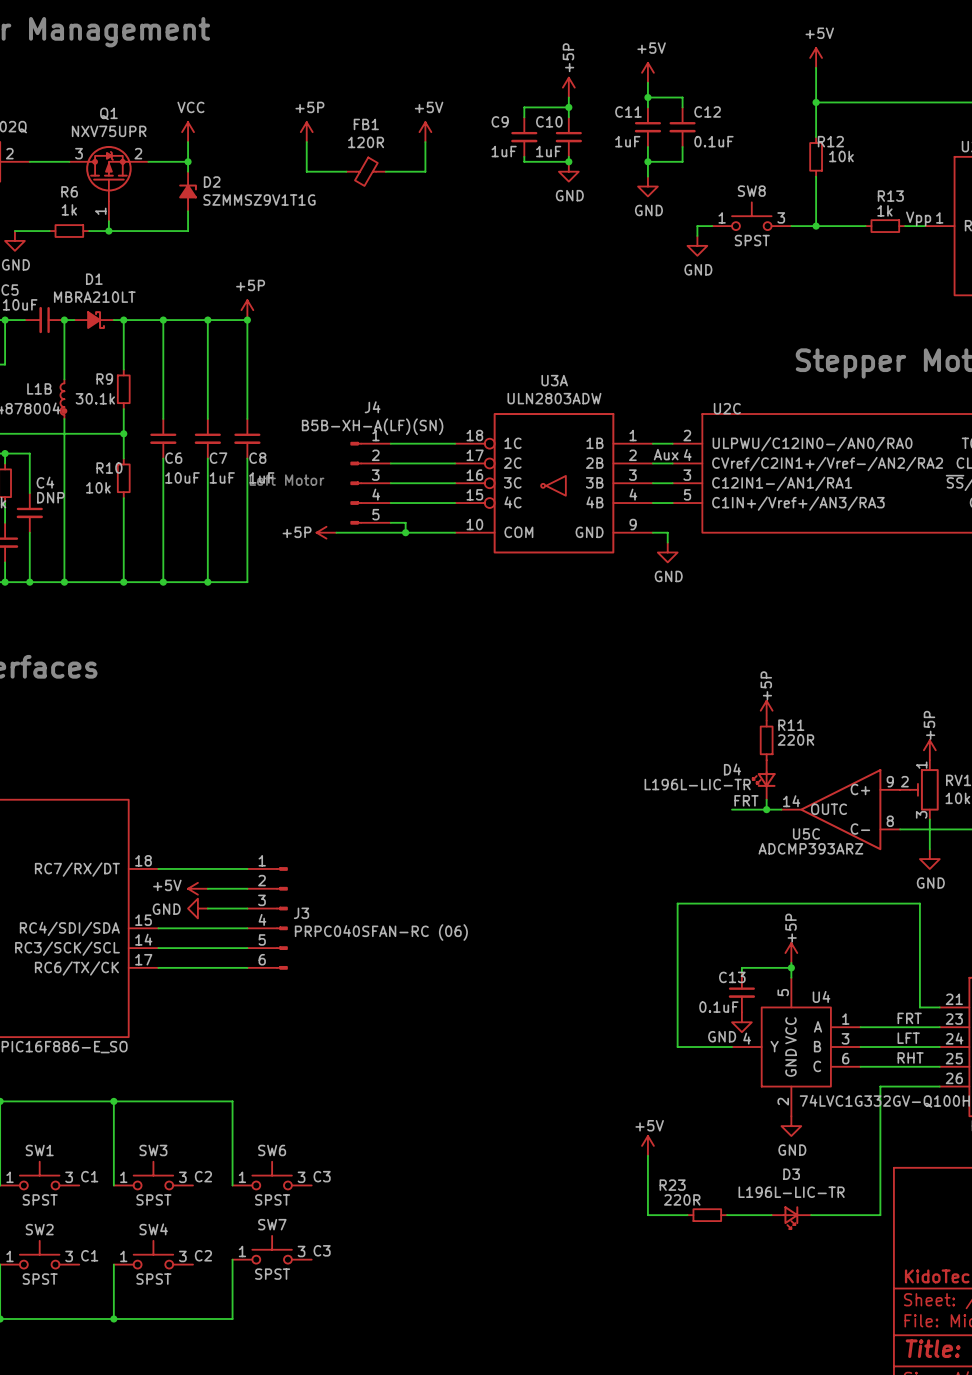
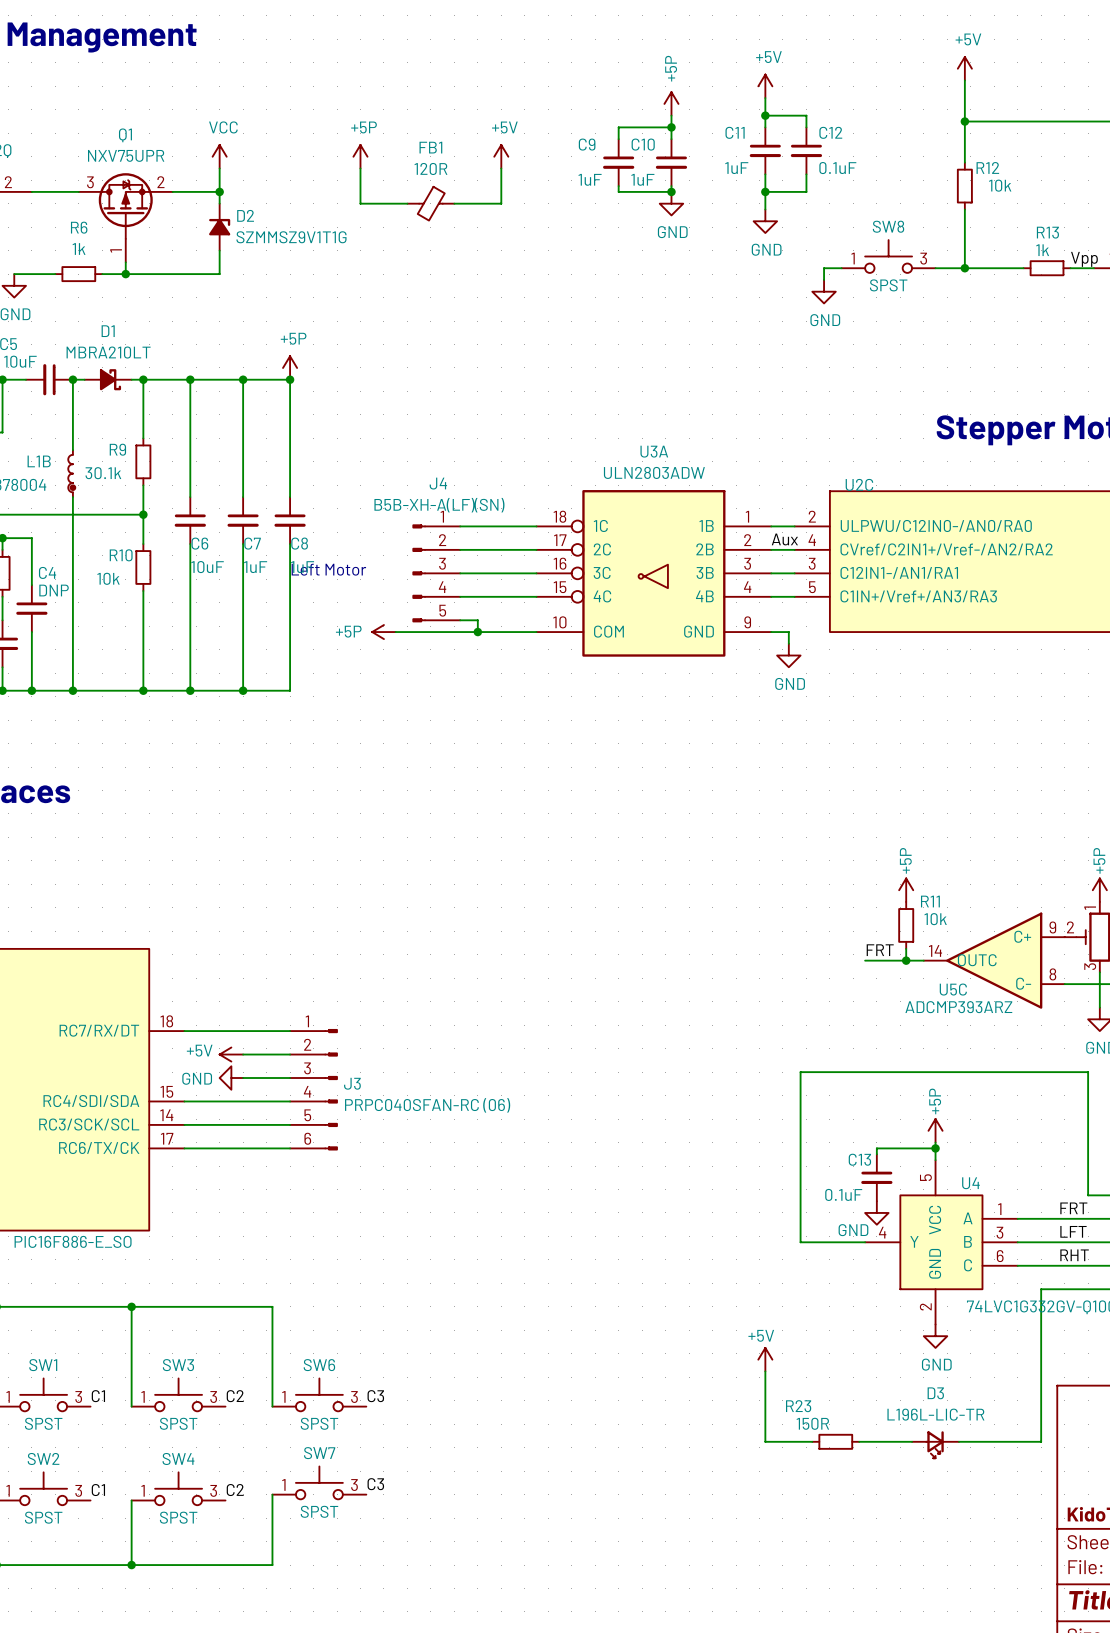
power symbol position: +5P (766, 710) -> +5P (906, 890)
R11 name position: R11 (791, 725) -> R11 (930, 901)
R11 position: (766, 740) -> (906, 925)
R11 value: 220R (796, 740) -> 10k (935, 919)
D4: L196L-LIC-TR (764, 779) -> none
R23 value: 220R (682, 1199) -> 150R (812, 1423)

